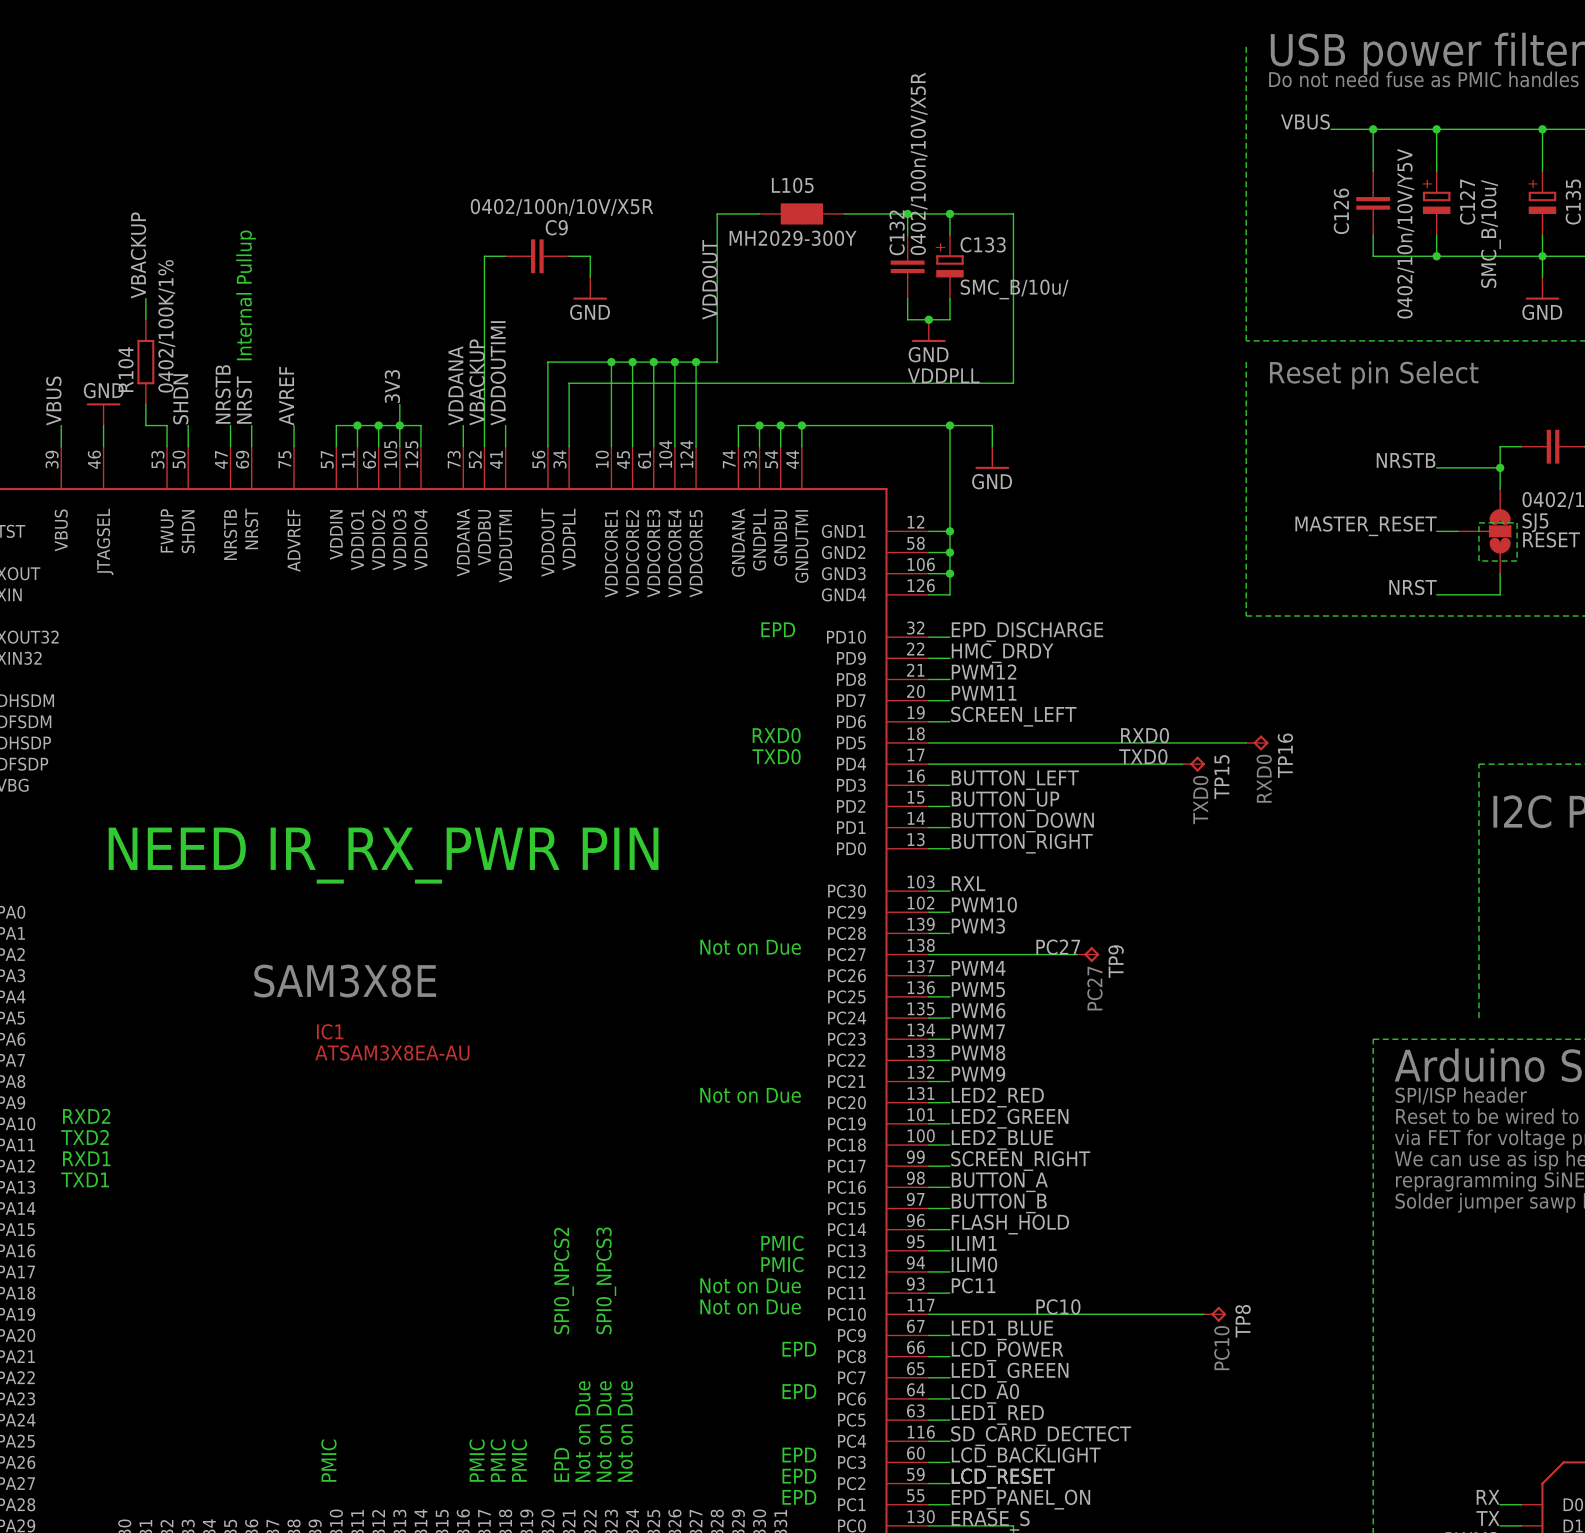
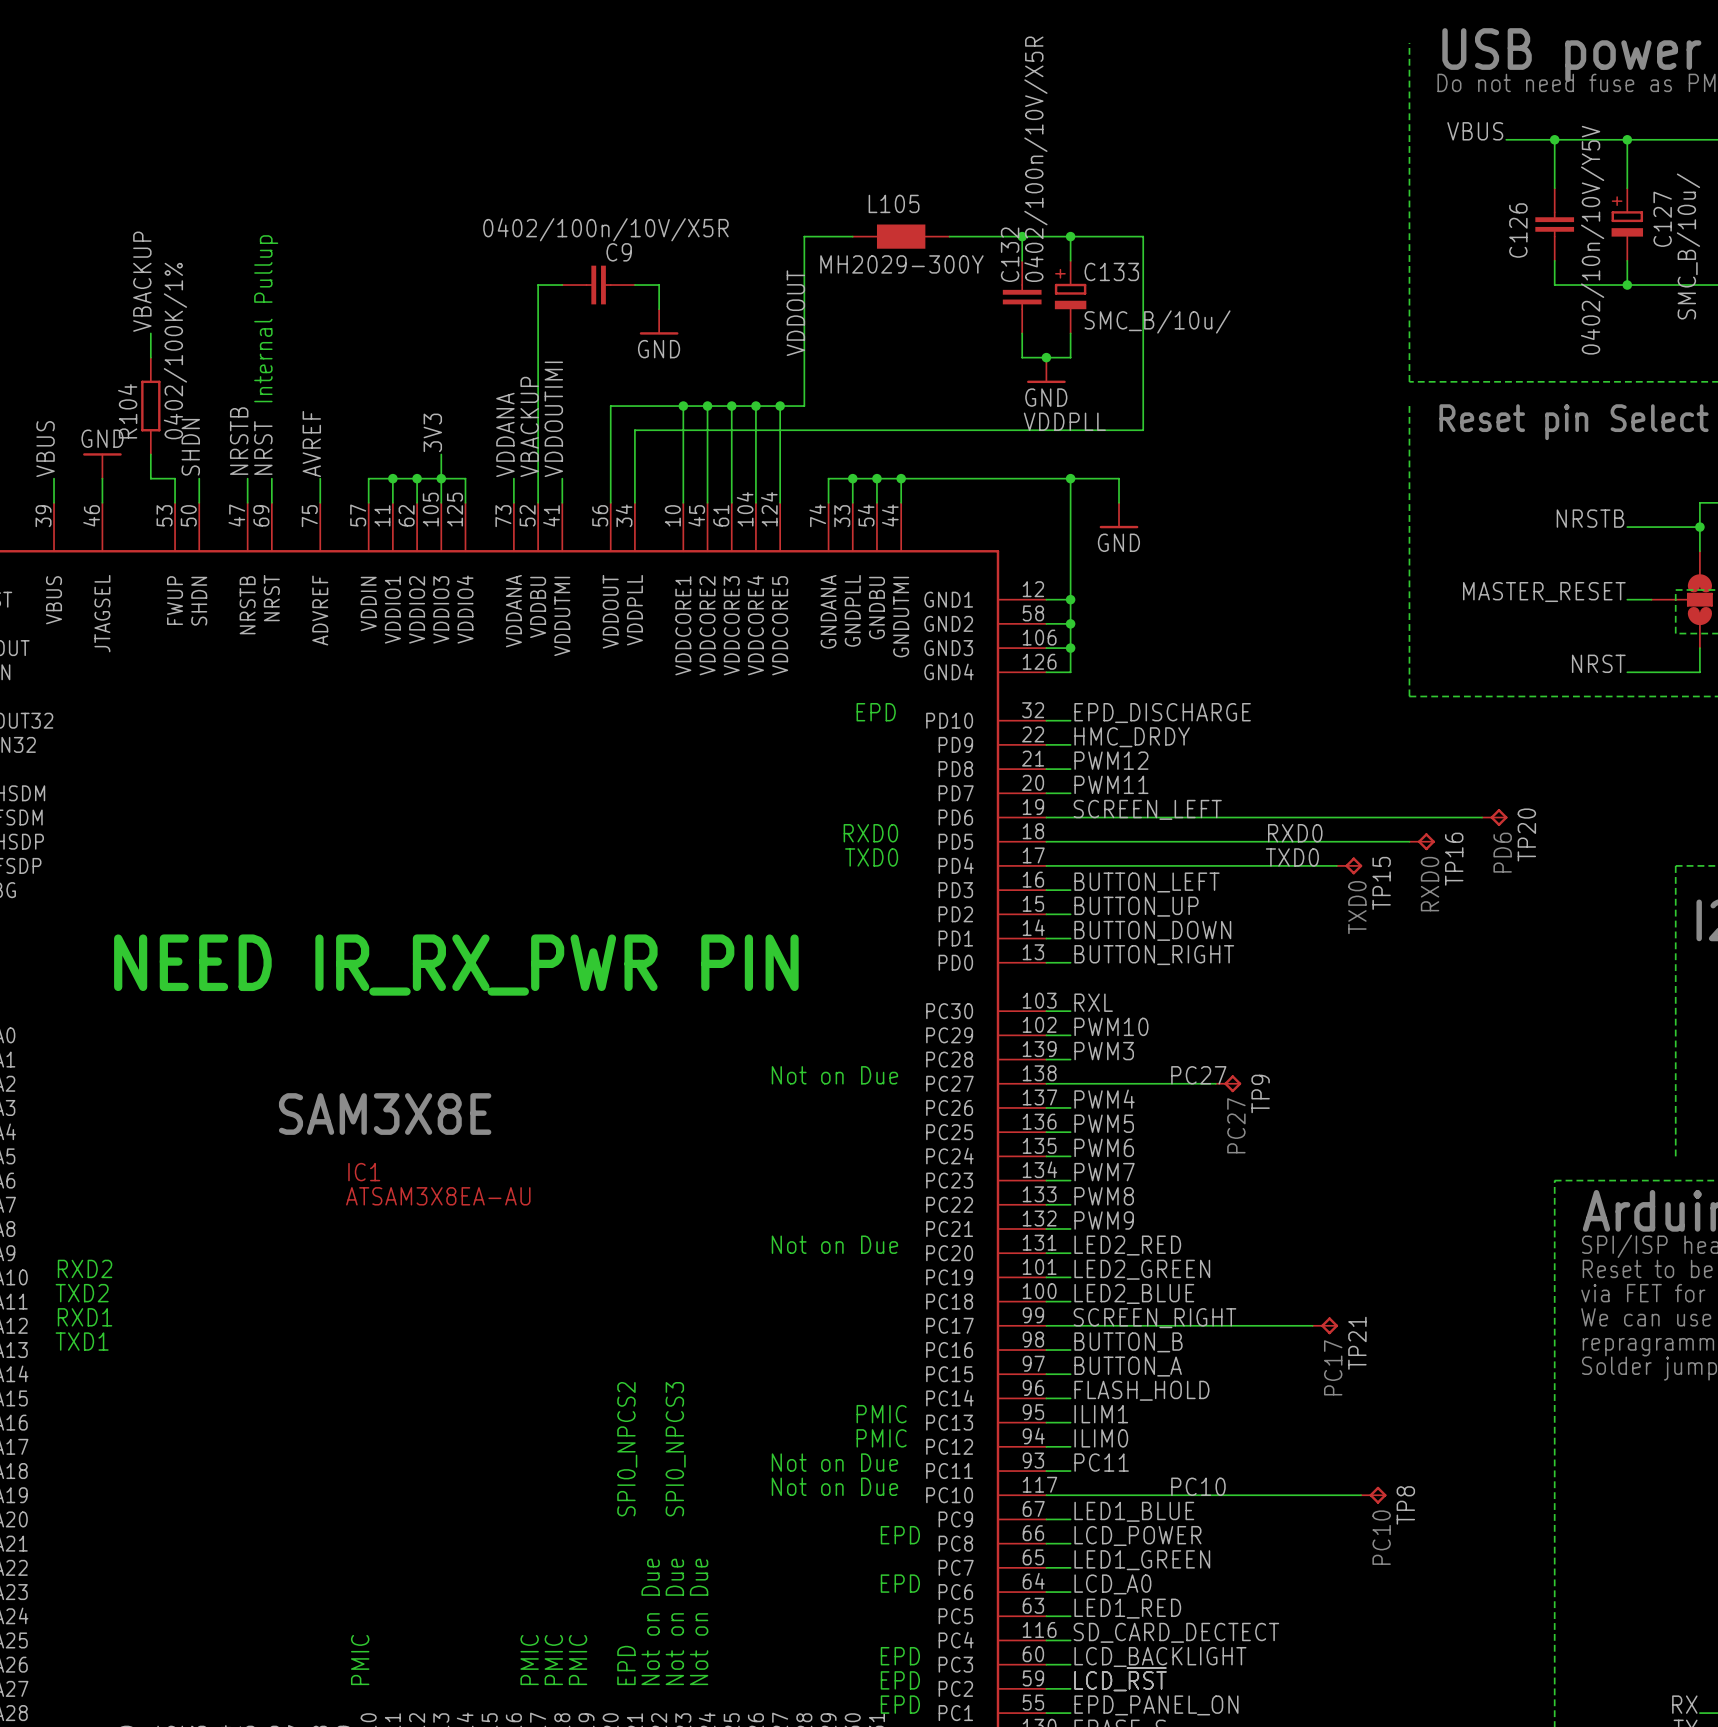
wire: none -> (1070, 817) (1482, 817)
TP20: none -> PD6 (1494, 817)
wire: none -> (1070, 1325) (1312, 1325)
TP21: none -> PC17 (1325, 1325)
label: BUTTON_A (999, 1182) -> BUTTON_B (1128, 1342)
label: BUTTON_B (999, 1203) -> BUTTON_A (1128, 1366)
label: LCD_RESET (1003, 1478) -> LCD_~{RST} (1120, 1679)

